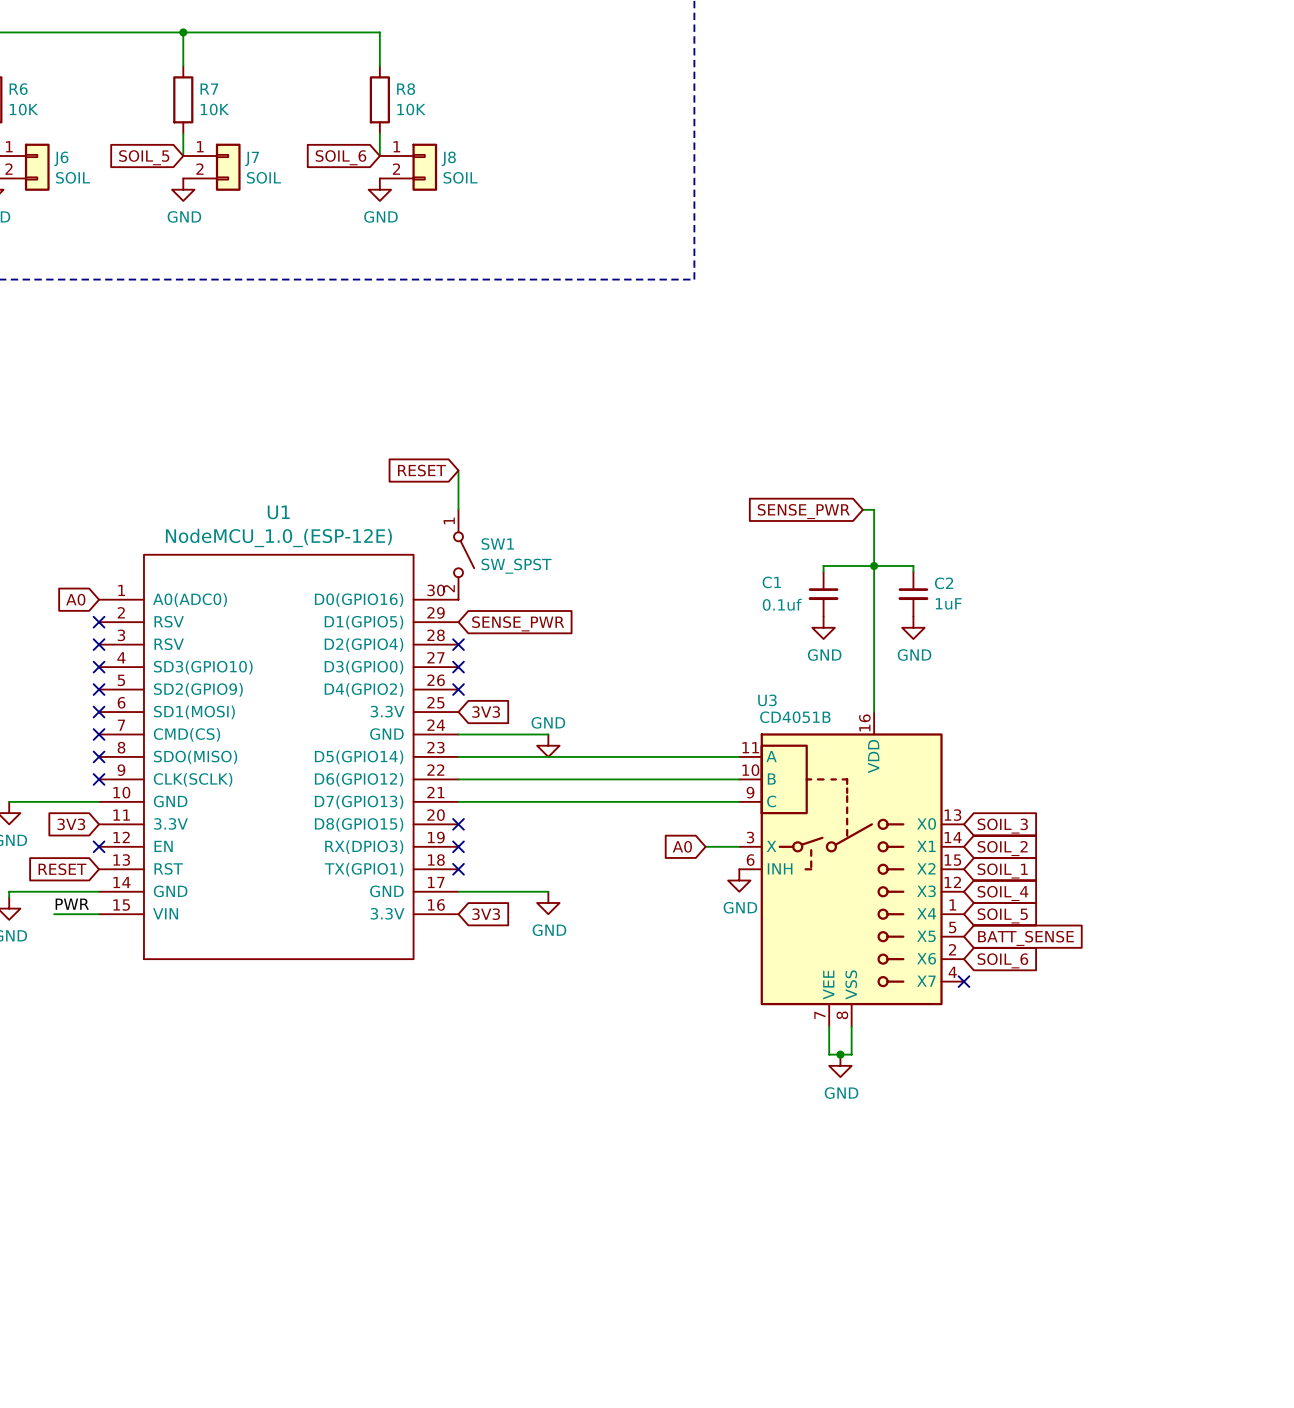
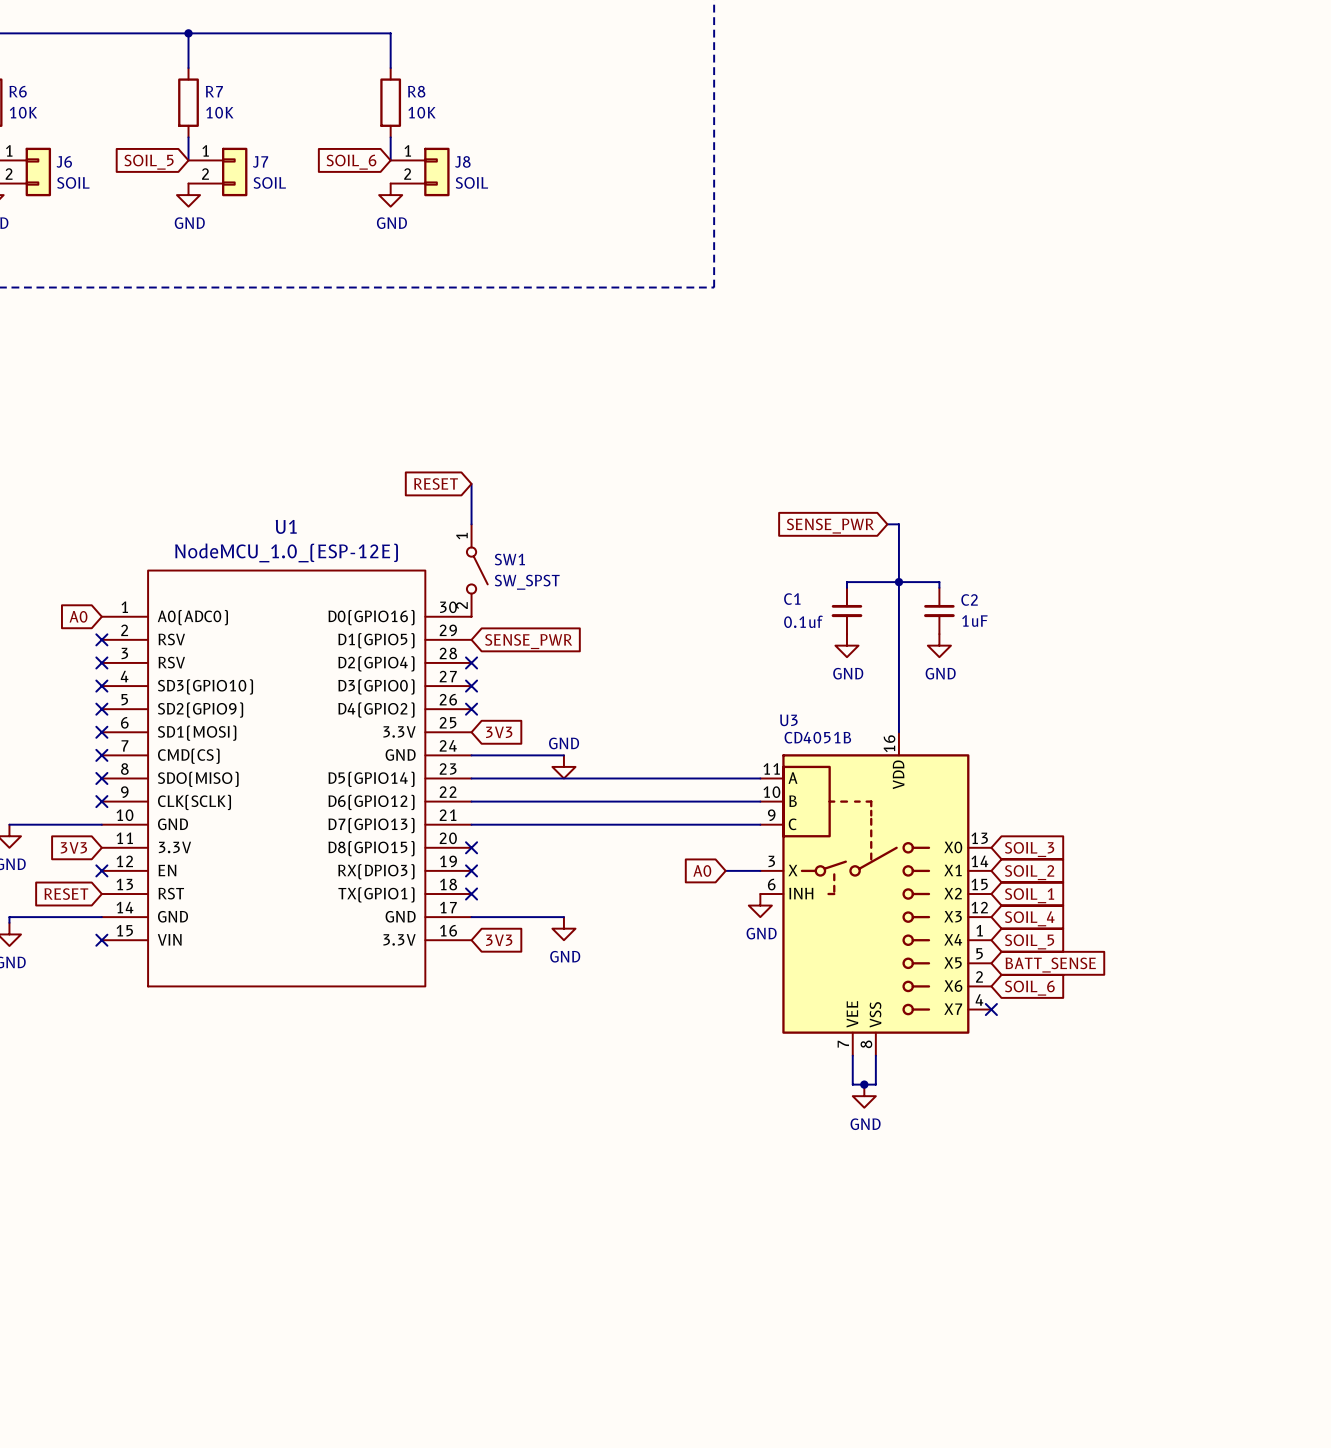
label: PWR (72, 904) -> none
wire: (54, 914) (99, 914) -> none
no-connect mark: none -> (101, 940)

